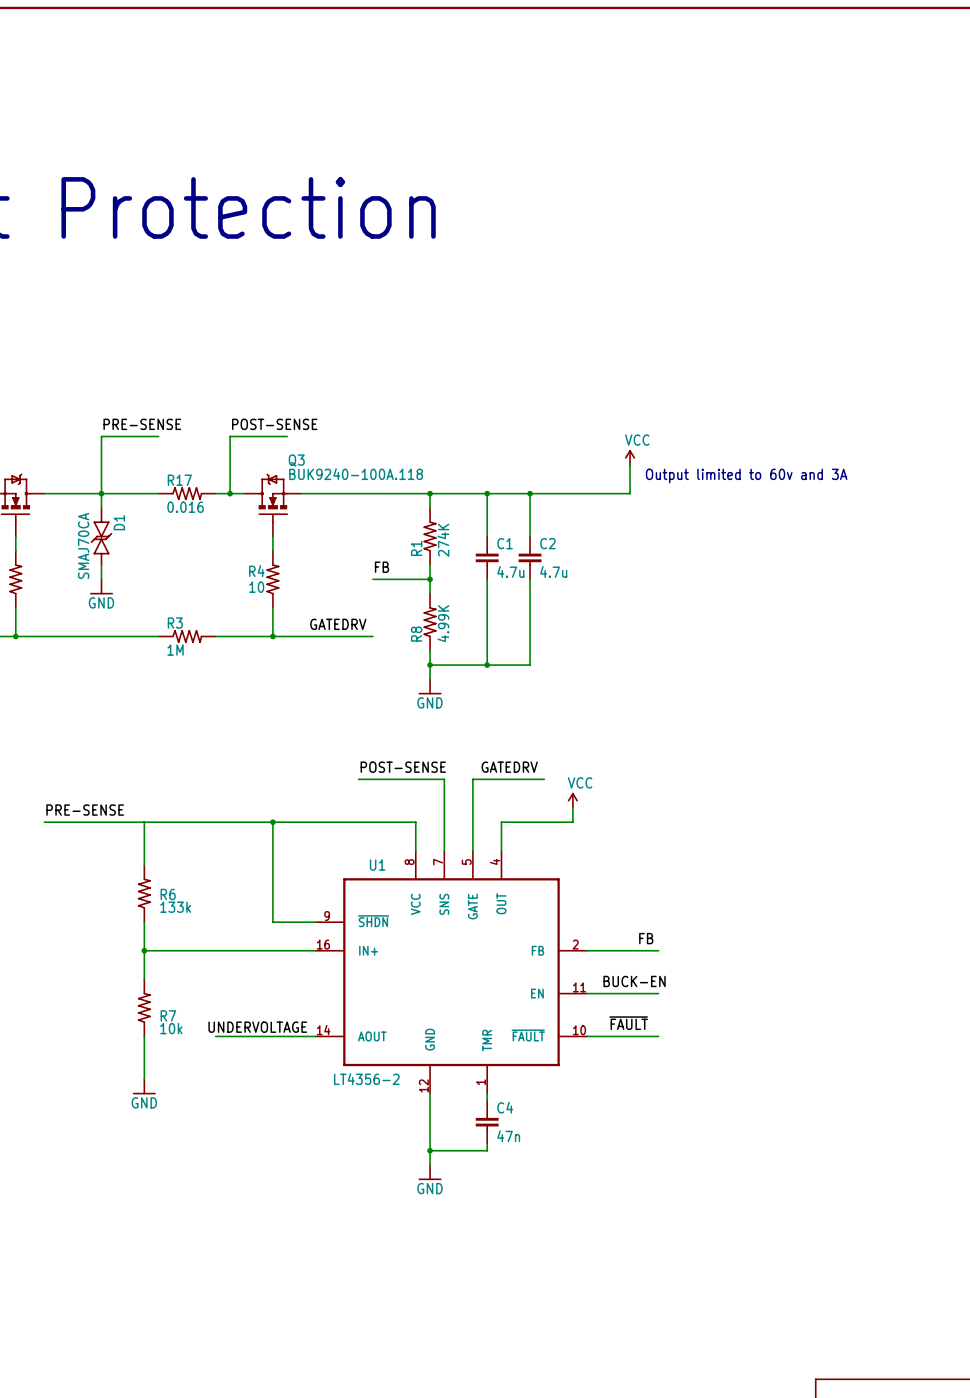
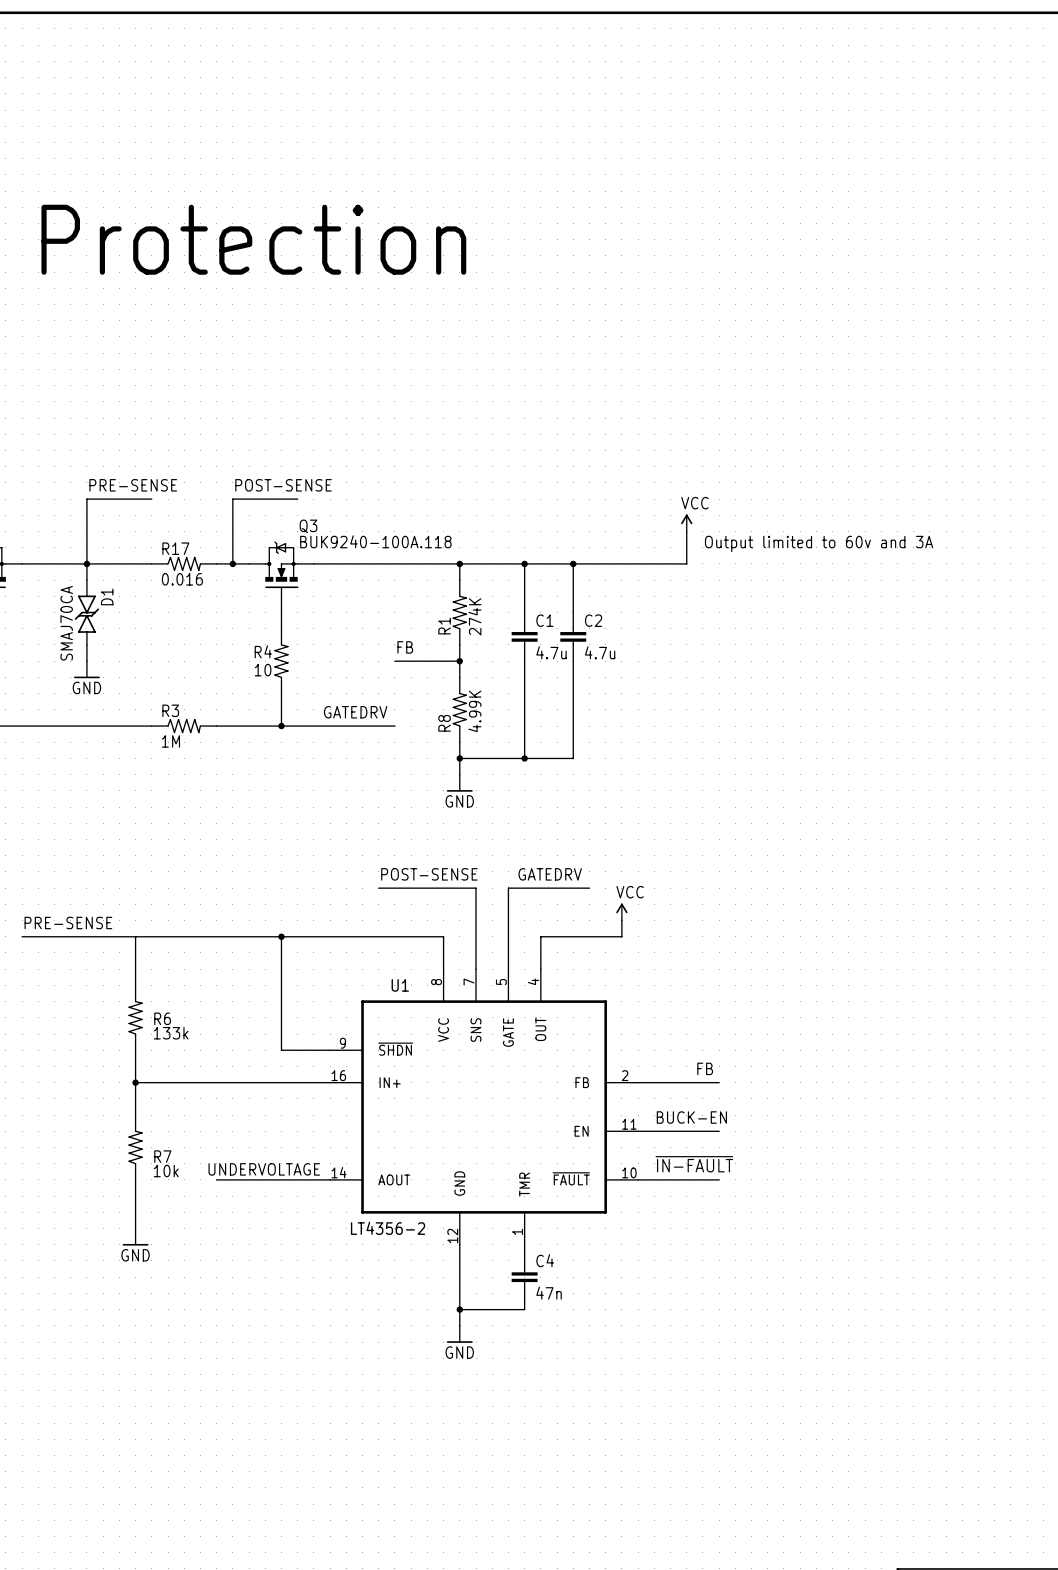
label: ~{FAULT} (628, 1023) -> ~{IN-FAULT} (694, 1164)

